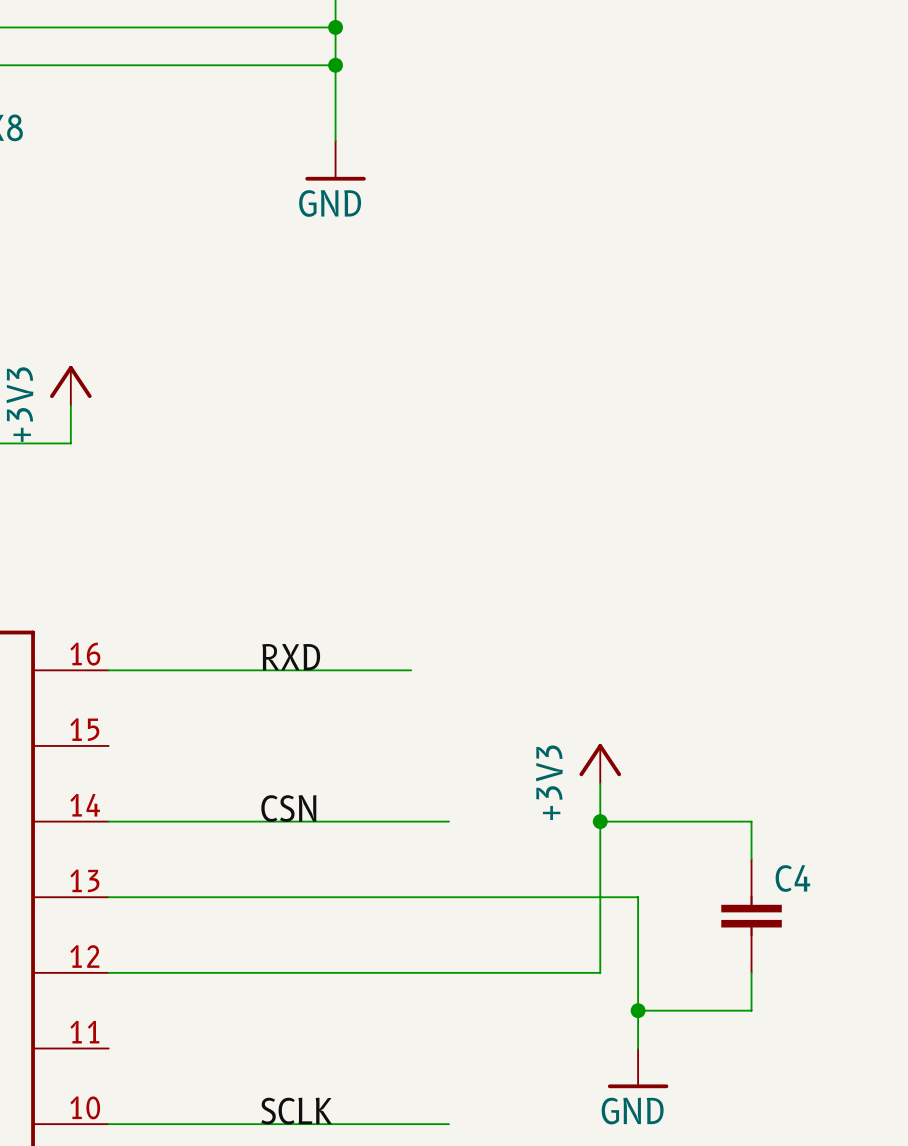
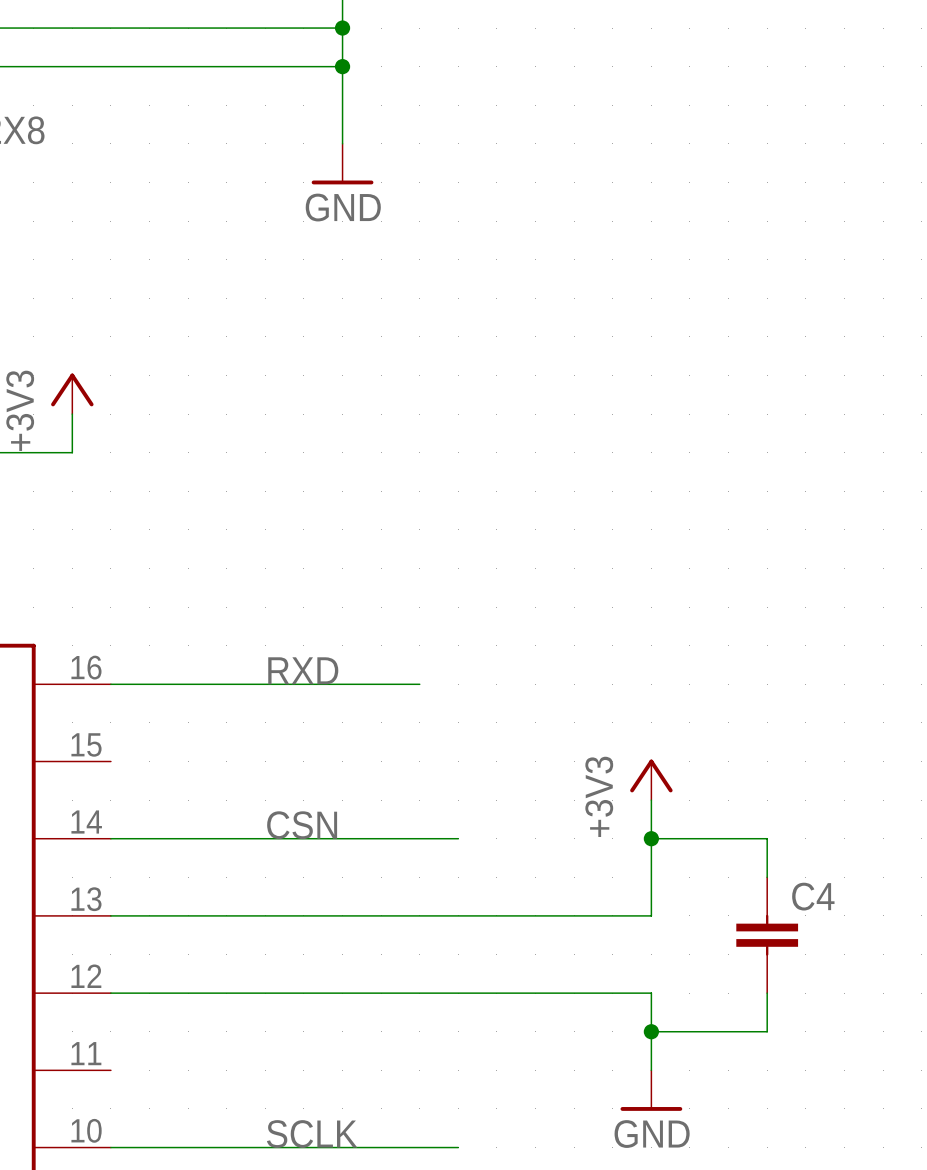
power symbol position: +3V3 (600, 763) -> +3V3 (651, 779)
wire: (600, 783) (600, 972) -> none
wire: none -> (651, 800) (651, 915)
wire: (600, 821) (638, 821) -> none
junction position: (600, 821) -> (651, 838)
wire: (638, 897) (638, 972) -> (612, 993) (651, 993)

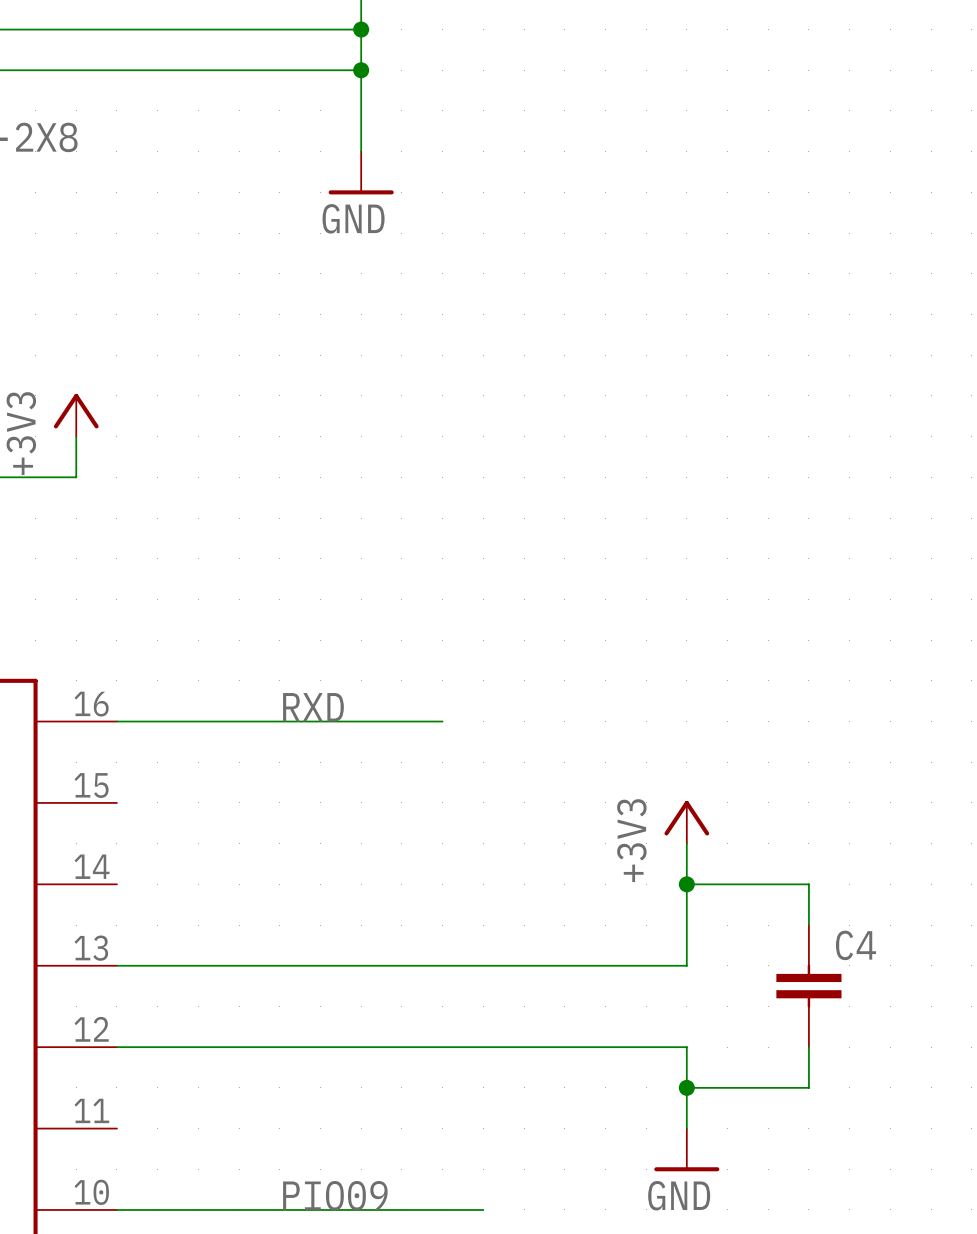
label: CSN (302, 825) -> none
wire: (110, 838) (458, 838) -> none
label: SCLK (312, 1134) -> PIO09 (335, 1195)

